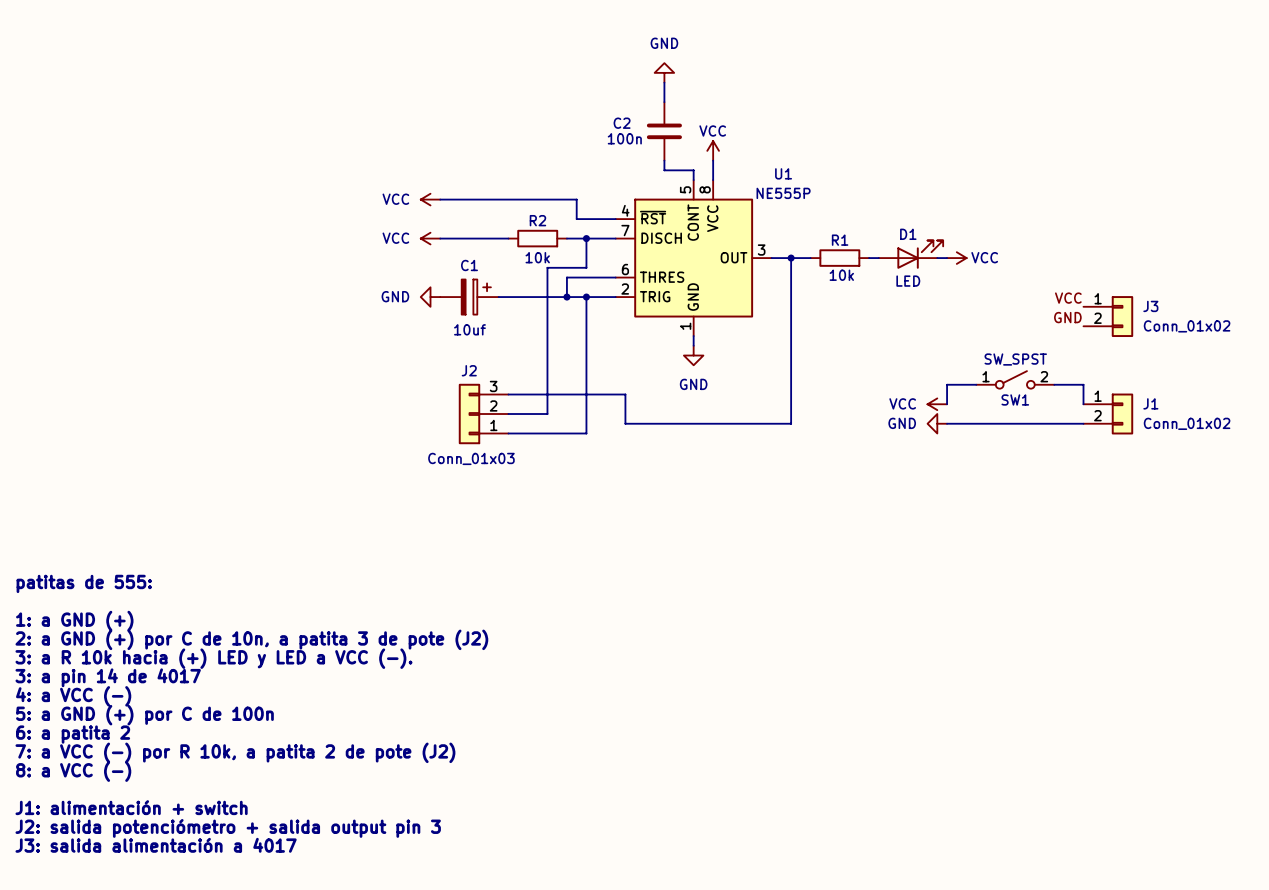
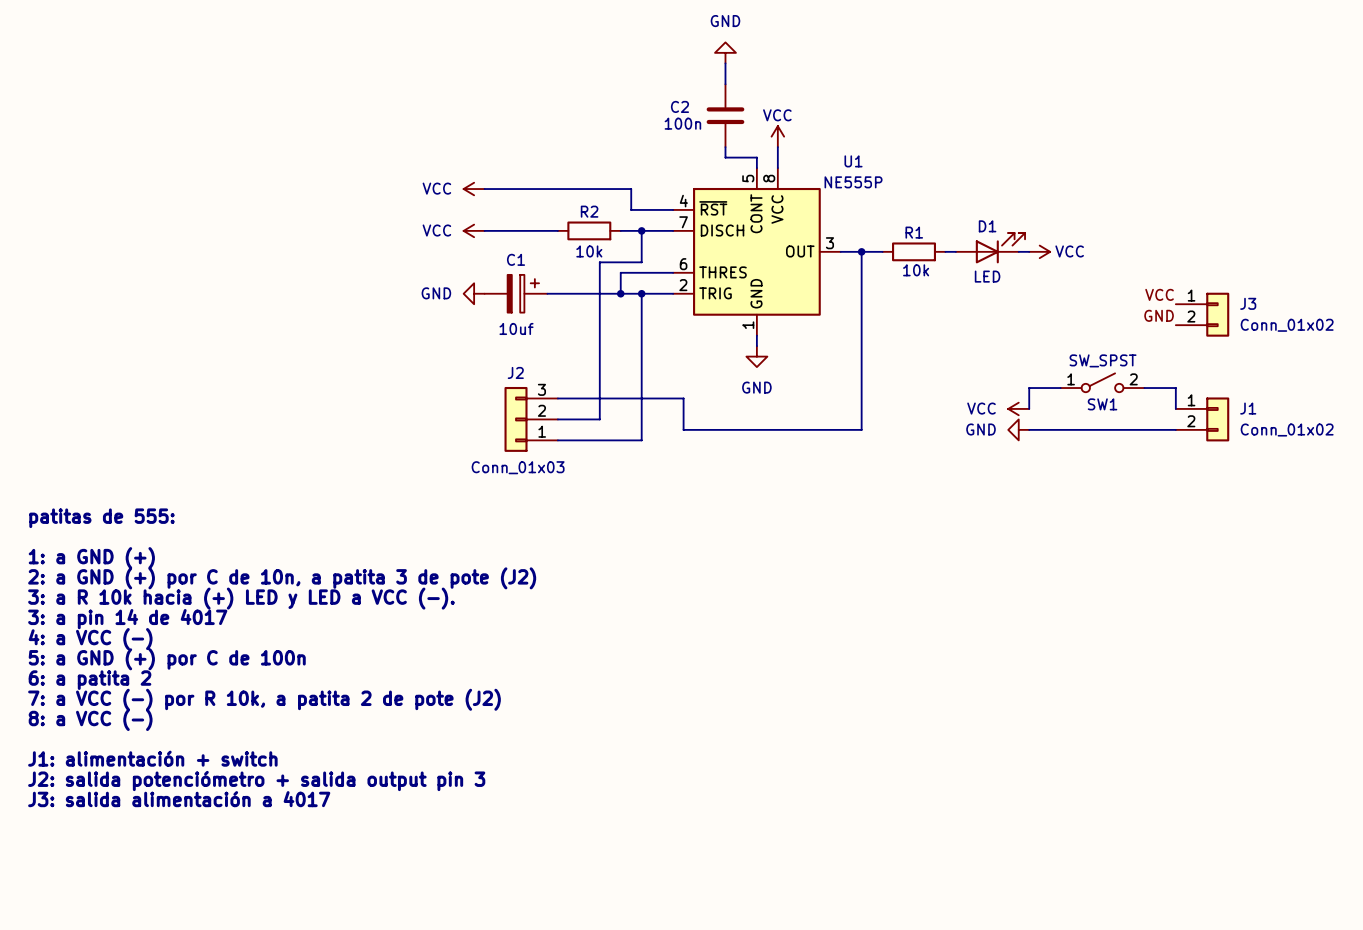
text position: patitas de 555: (84, 583) -> patitas de 555: (101, 518)
text position: 1: a GND (+) (74, 621) -> 1: a GND (+) (91, 558)
text position: 2: a GND (+) por C de 10n, a patita 3 de pote (J2) (251, 639) -> 2: a GND (+) por C de 10n, a patita 3 de pote (J2) (282, 578)
text position: 3: a R 10k hacia (+) LED y LED a VCC (-). (213, 658) -> 3: a R 10k hacia (+) LED y LED a VCC (-). (241, 598)
text position: 3: a pin 14 de 4017 (108, 677) -> 3: a pin 14 de 4017 (127, 619)
text position: 4: a VCC (-) (73, 696) -> 4: a VCC (-) (90, 639)
text position: 5: a GND (+) por C de 100n (144, 715) -> 5: a GND (+) por C de 100n (167, 659)
text position: 6: a patita 2 (73, 734) -> 6: a patita 2 (90, 680)
text position: 7: a VCC (-) por R 10k, a patita 2 de pote (J2) (235, 752) -> 7: a VCC (-) por R 10k, a patita 2 de pote (J2) (264, 699)
text position: 8: a VCC (-) (73, 771) -> 8: a VCC (-) (90, 719)
text position: J1: alimentación + switch (131, 807) -> J1: alimentación + switch (152, 758)
text position: J2: salida potenciómetro + salida output pin 3 (228, 828) -> J2: salida potenciómetro + salida output pin 3 (256, 781)
text position: J3: salida alimentación a 4017 (156, 845) -> J3: salida alimentación a 4017 (179, 799)

